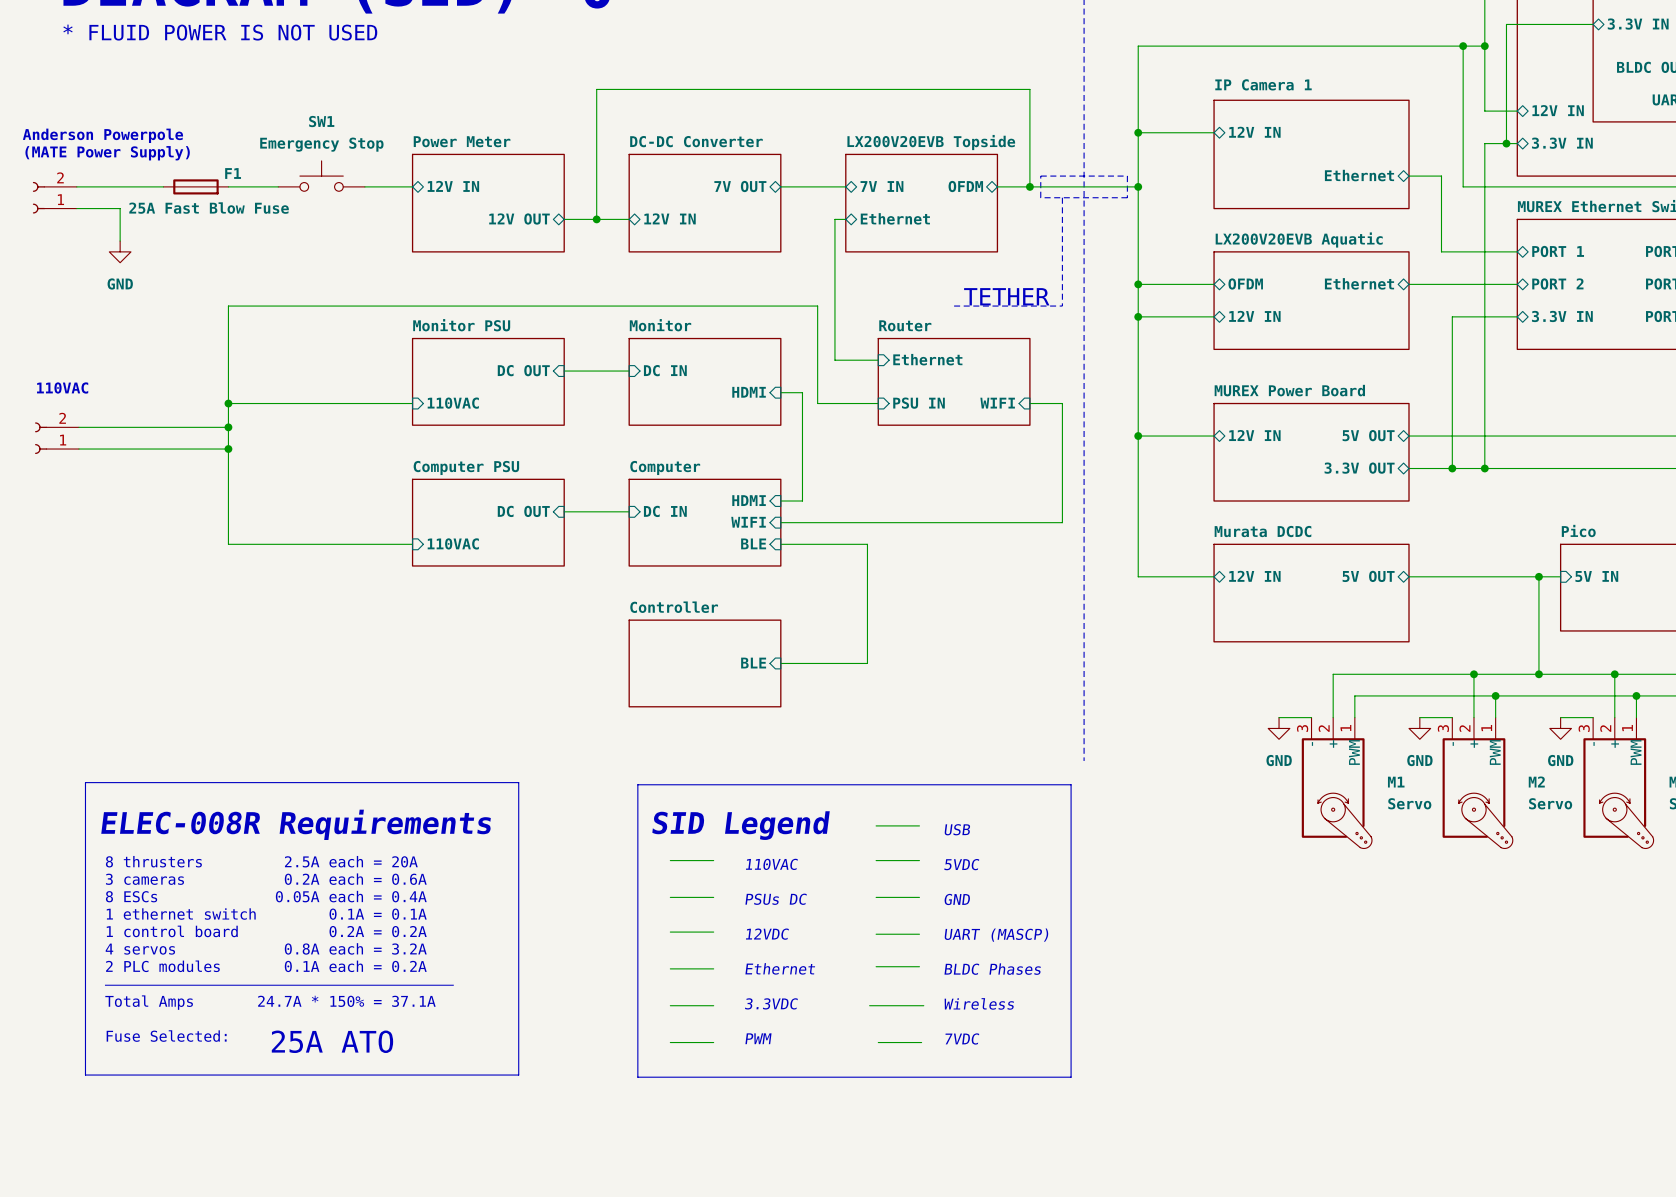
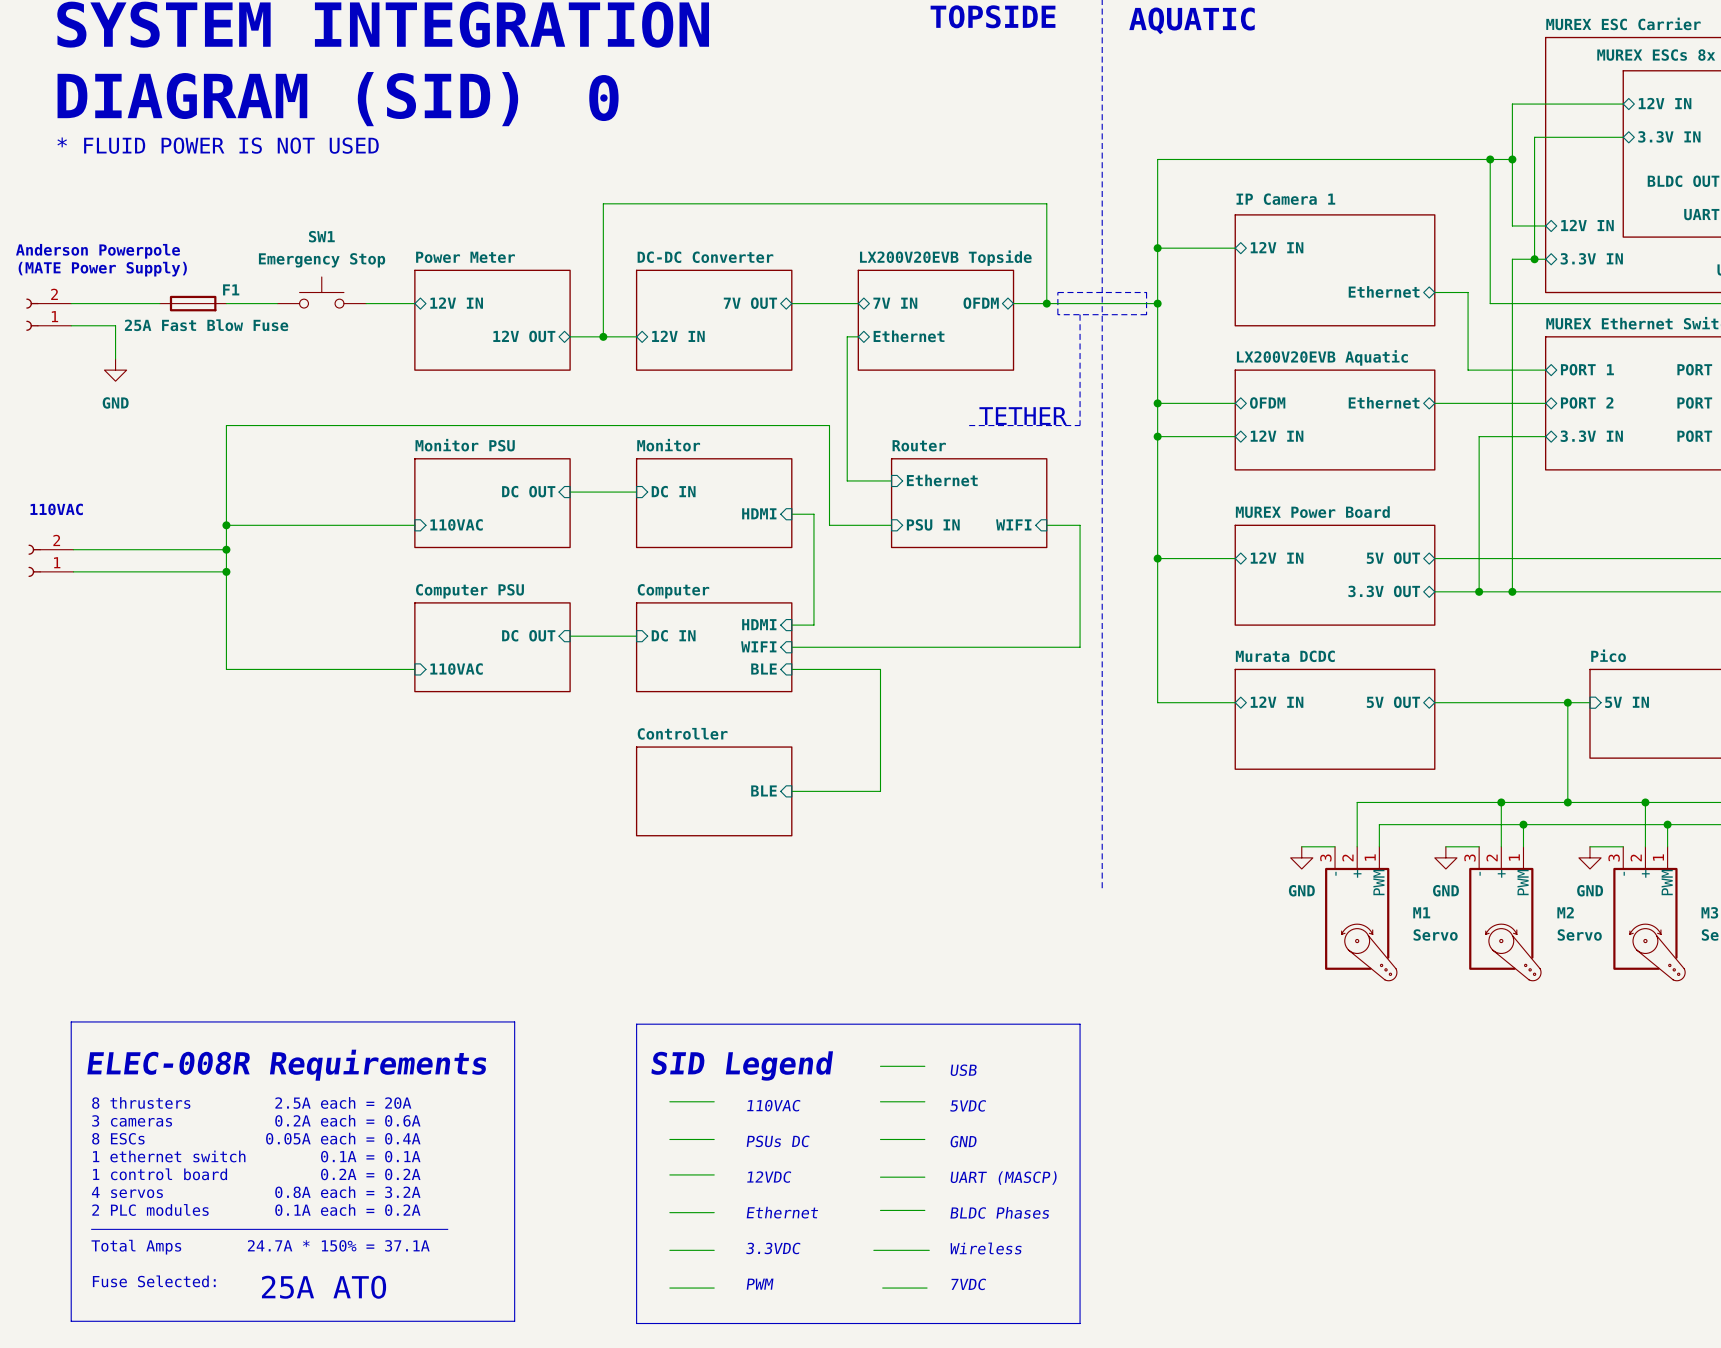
line: (85, 782) (518, 782) (518, 1075) (85, 1075) (85, 782) -> (71, 1021) (514, 1021) (514, 1321) (71, 1321) (71, 1021)
line: (637, 784) (1071, 784) (1071, 1077) (637, 1077) (637, 784) -> (636, 1024) (1080, 1024) (1080, 1323) (636, 1323) (636, 1024)
text position: ELEC-008R Requirements (296, 824) -> ELEC-008R Requirements (286, 1065)
text position: SID Legend (741, 825) -> SID Legend (742, 1065)
wire: (876, 825) (919, 825) -> (880, 1066) (924, 1066)
text position: USB (957, 829) -> USB (963, 1070)
wire: (670, 860) (713, 860) -> (669, 1101) (714, 1101)
wire: (876, 860) (919, 860) -> (880, 1210) (924, 1210)
text position: 8 thrusters 2.5A each = 20A (261, 861) -> 8 thrusters 2.5A each = 20A (251, 1102)
text position: 110VAC (771, 864) -> 110VAC (773, 1105)
text position: 5VDC (961, 864) -> 5VDC (968, 1105)
text position: 3 cameras 0.2A each = 0.6A (266, 879) -> 3 cameras 0.2A each = 0.6A (256, 1120)
text position: 8 ESCs 0.05A each = 0.4A (266, 896) -> 8 ESCs 0.05A each = 0.4A (256, 1138)
wire: (670, 897) (713, 897) -> (669, 1139) (714, 1139)
wire: (876, 897) (919, 897) -> (880, 1139) (924, 1139)
text position: PSUs DC (776, 899) -> PSUs DC (778, 1141)
text position: GND (957, 899) -> GND (963, 1141)
text position: 1 ethernet switch 0.1A = 0.1A (266, 914) -> 1 ethernet switch 0.1A = 0.1A (256, 1156)
text position: 1 control board 0.2A = 0.2A (266, 931) -> 1 control board 0.2A = 0.2A (256, 1174)
wire: (670, 932) (713, 932) -> (669, 1174) (714, 1174)
text position: 12VDC (767, 934) -> 12VDC (769, 1177)
wire: (876, 934) (919, 934) -> (880, 1177) (924, 1177)
text position: UART (MASCP) (996, 935) -> UART (MASCP) (1003, 1178)
text position: 4 servos 0.8A each = 3.2A (266, 948) -> 4 servos 0.8A each = 3.2A (256, 1192)
text position: 2 PLC modules 0.1A each = 0.2A (266, 966) -> 2 PLC modules 0.1A each = 0.2A (256, 1209)
wire: (910, 966) (919, 966) -> (880, 1101) (889, 1101)
wire: (670, 968) (713, 968) -> (669, 1212) (714, 1212)
text position: Ethernet (780, 968) -> Ethernet (782, 1212)
text position: BLDC Phases (992, 969) -> BLDC Phases (999, 1212)
text position: ——————————————————————————————————————— (279, 985) -> ——————————————————————————————————————— (269, 1229)
text position: Total Amps 24.7A * 150% = 37.1A (270, 1002) -> Total Amps 24.7A * 150% = 37.1A (260, 1247)
text position: 3.3VDC (771, 1003) -> 3.3VDC (773, 1248)
text position: Wireless (979, 1003) -> Wireless (986, 1248)
wire: (670, 1005) (713, 1005) -> (669, 1250) (714, 1250)
wire: (869, 1005) (923, 1005) -> (873, 1250) (929, 1250)
text position: Fuse Selected: (166, 1036) -> Fuse Selected: (154, 1281)
text position: PWM (758, 1038) -> PWM (760, 1284)
text position: 7VDC (962, 1038) -> 7VDC (968, 1284)
text position: 25A ATO (332, 1041) -> 25A ATO (324, 1287)
wire: (670, 1042) (713, 1042) -> (669, 1288) (714, 1288)
wire: (878, 1042) (921, 1042) -> (882, 1288) (927, 1288)

